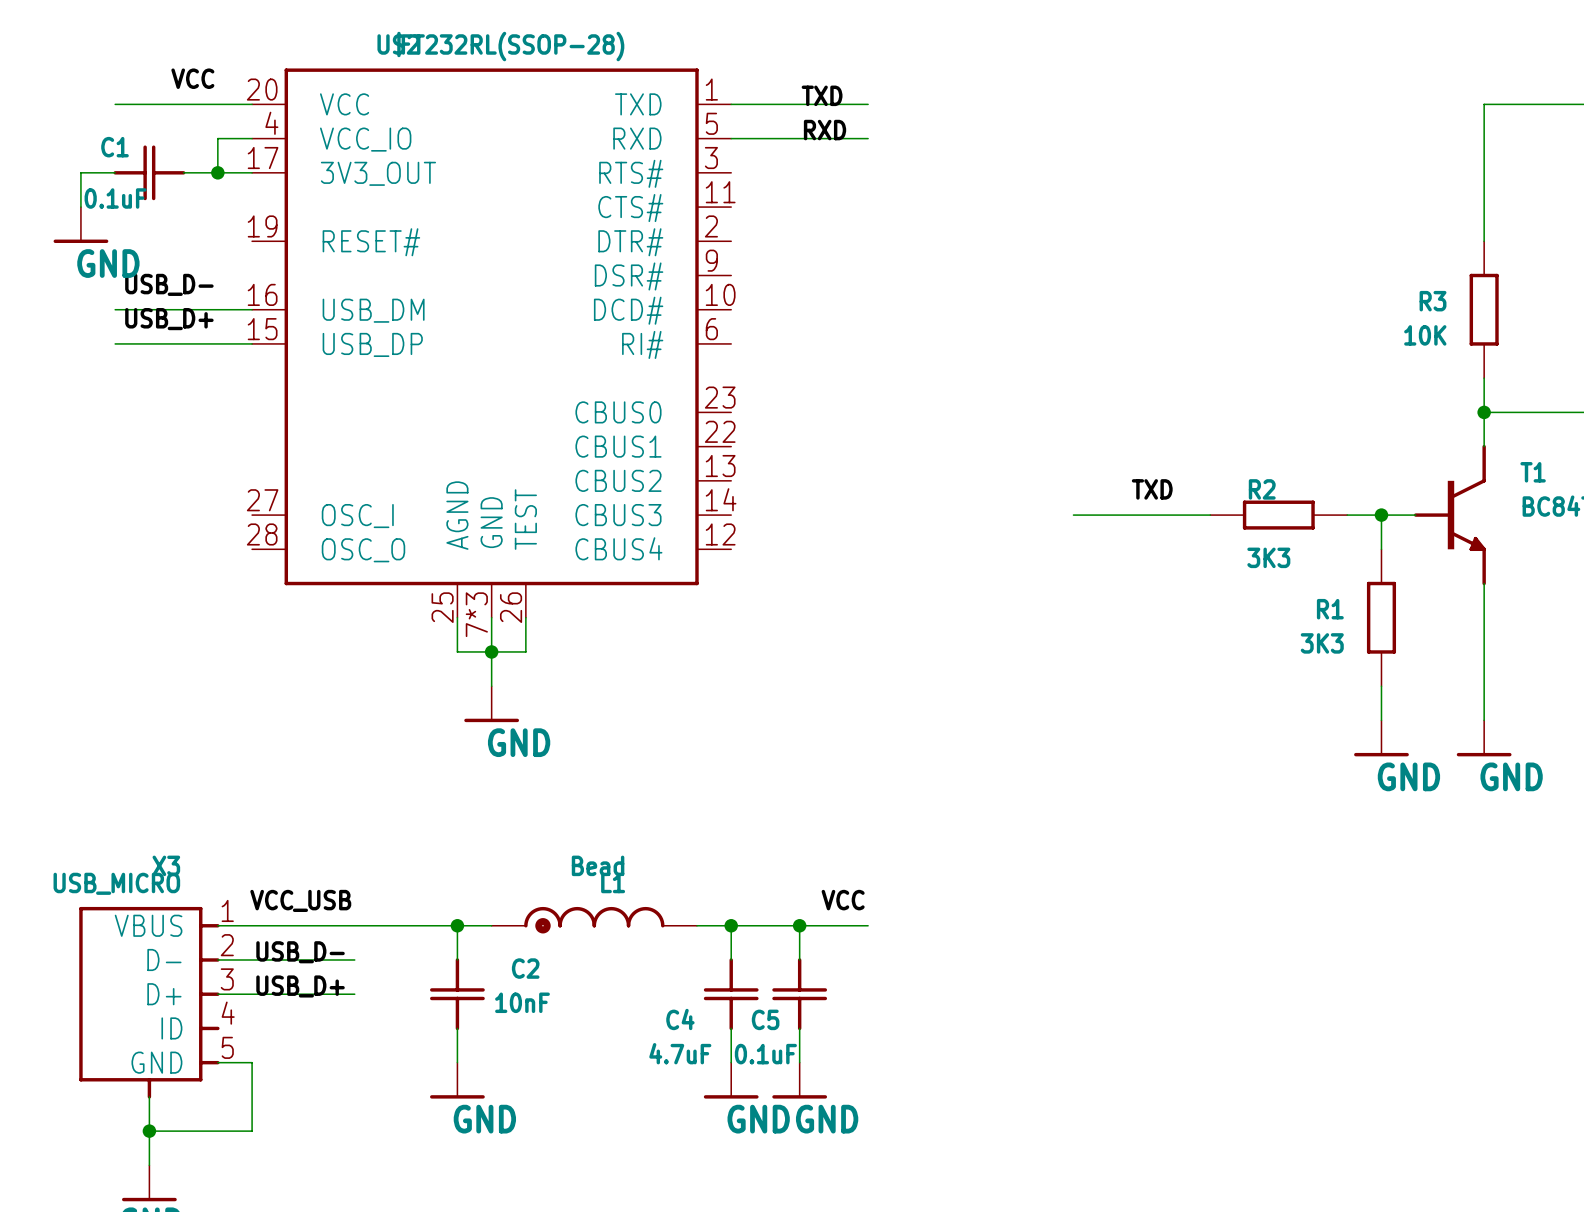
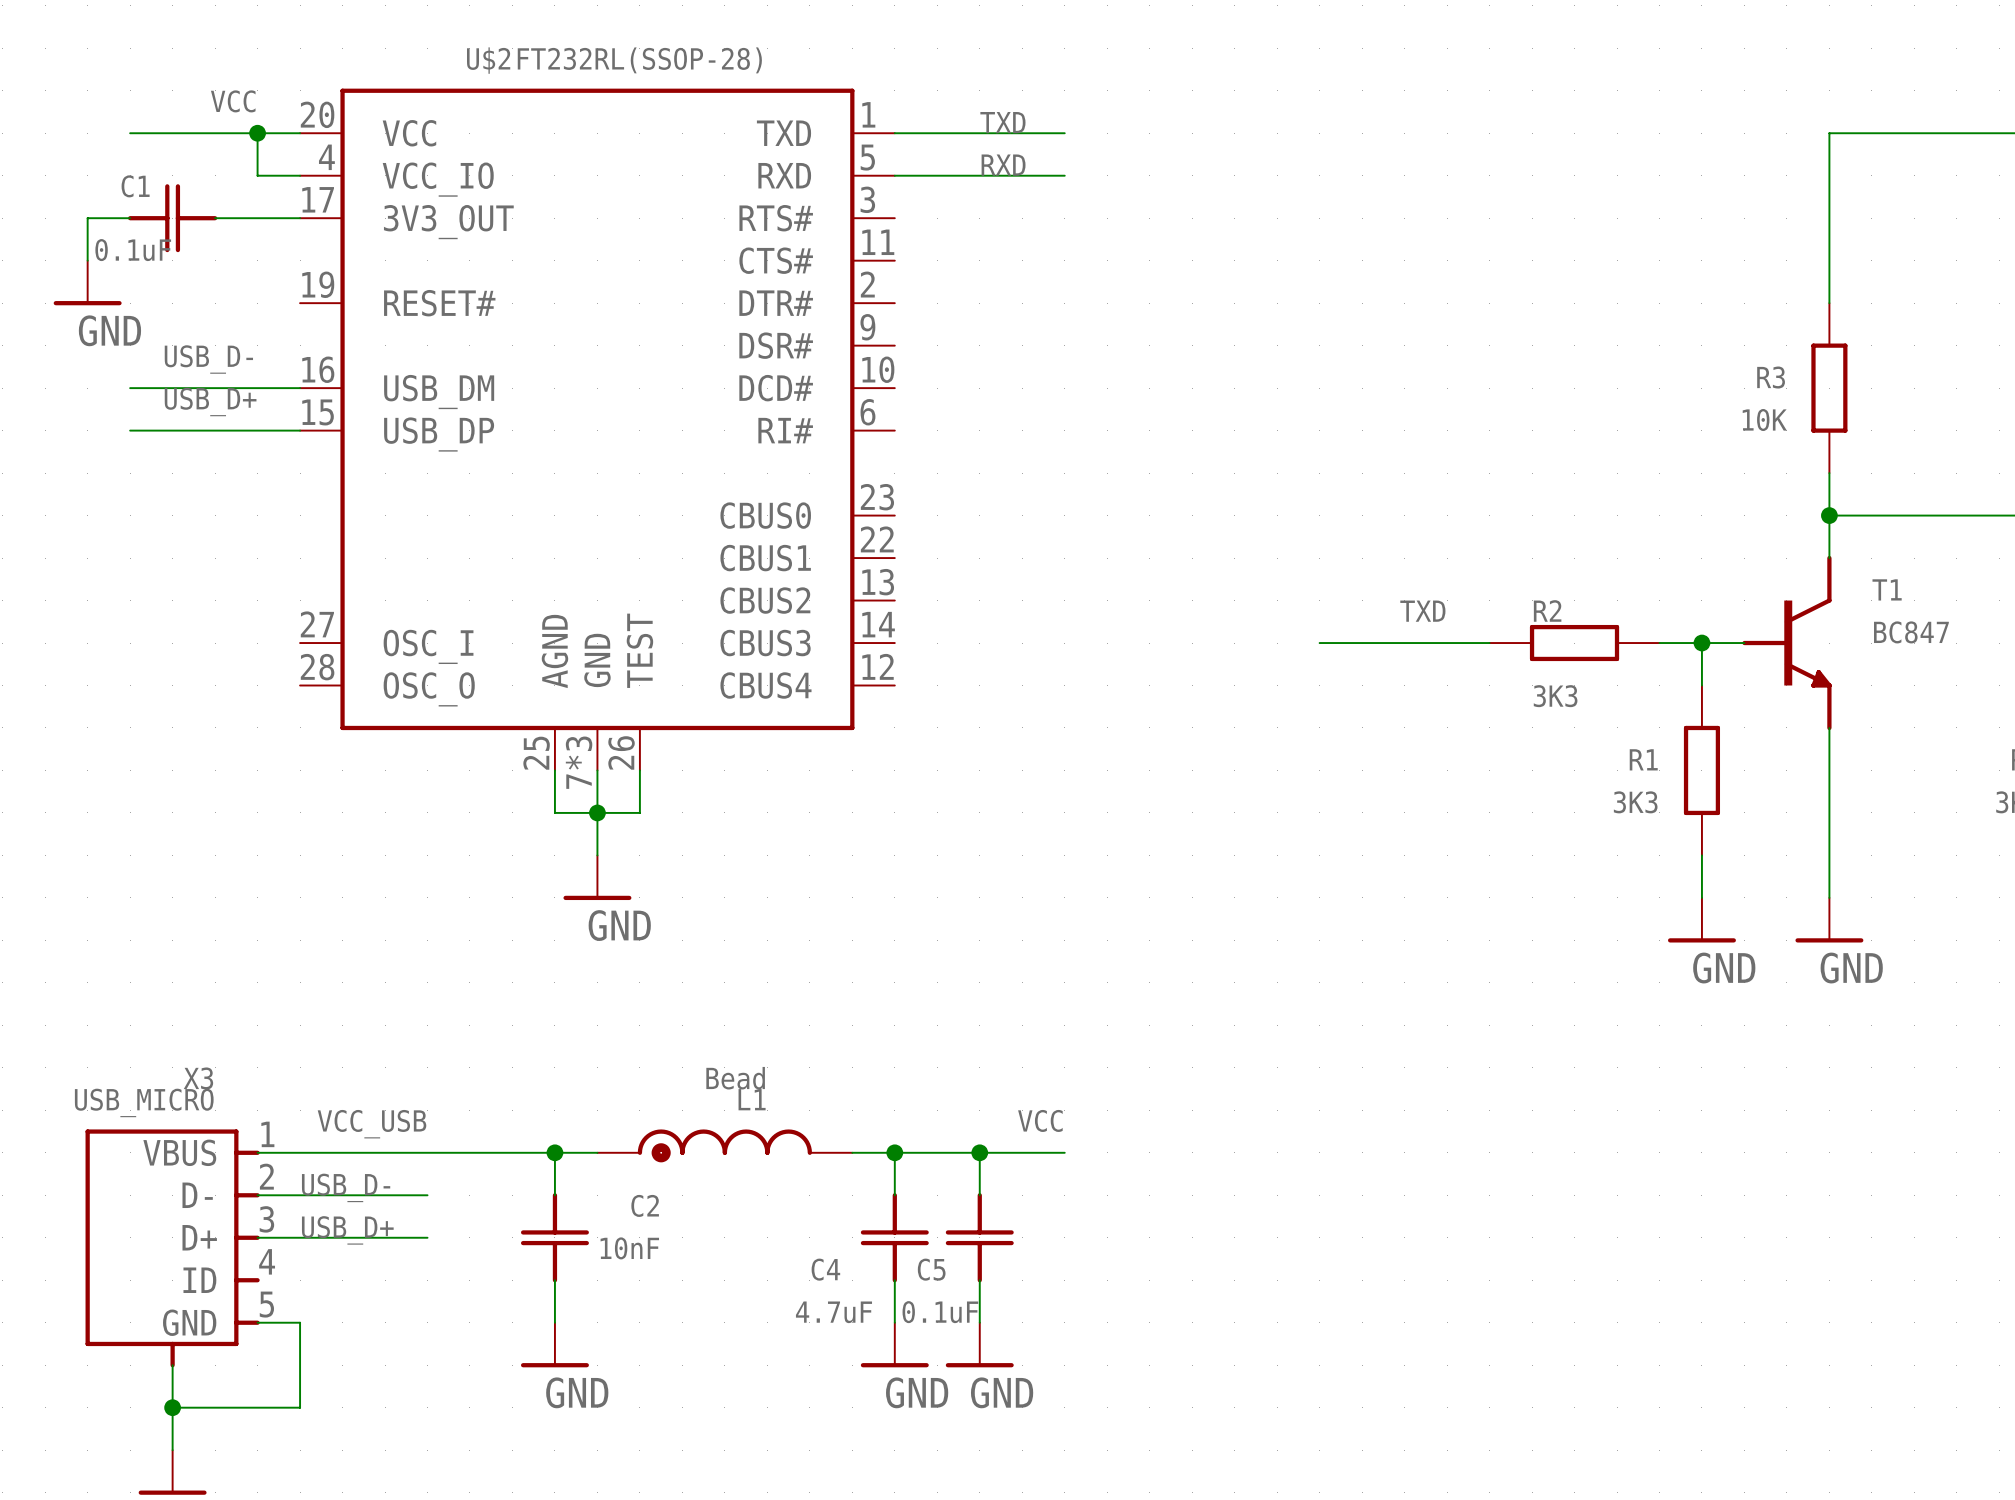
wire: (217, 138) (217, 172) -> (257, 175) (257, 133)
junction position: (217, 172) -> (257, 133)

